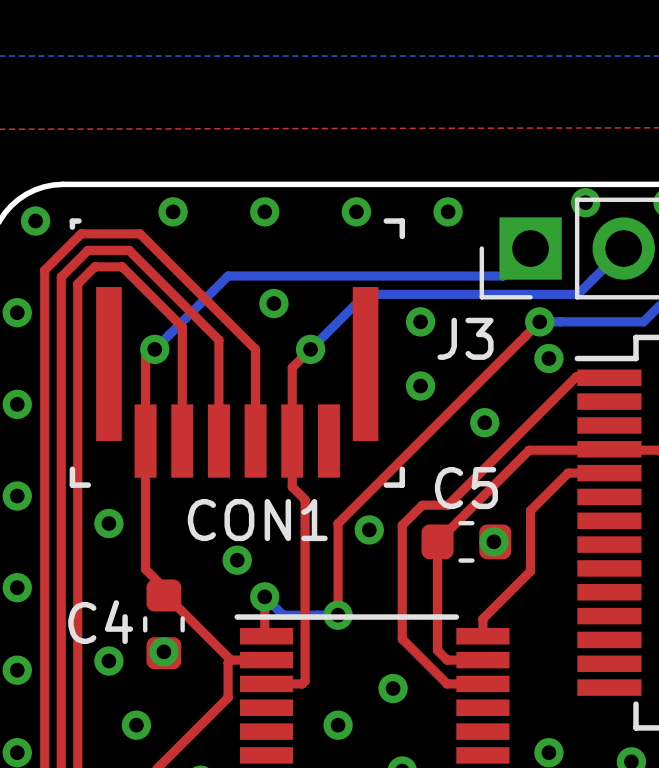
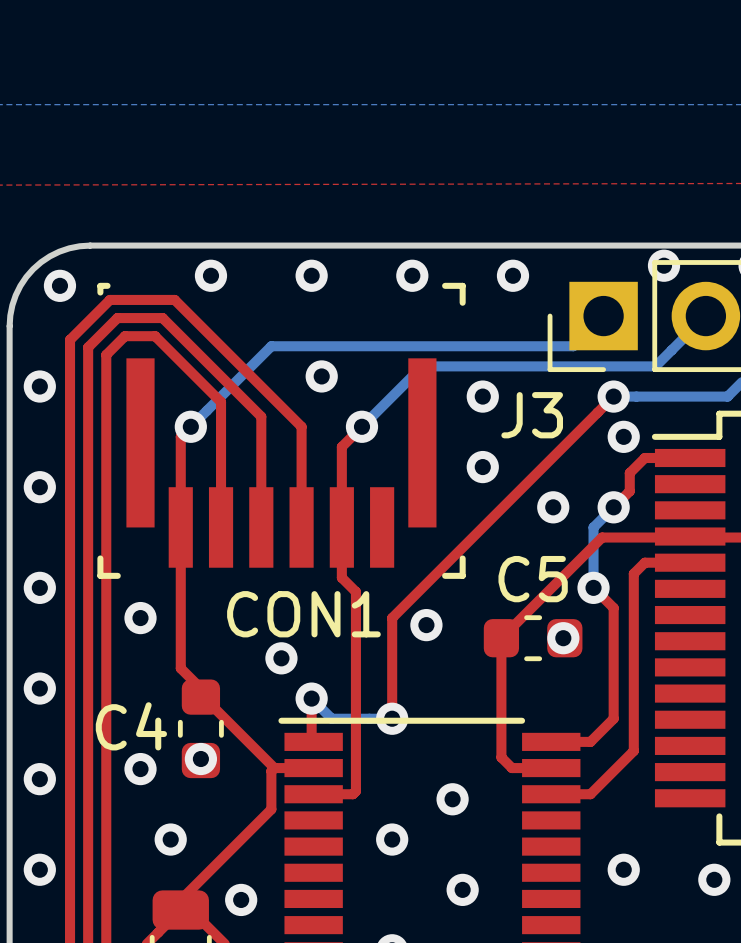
top track: (603, 376) (576, 376) (448, 505) (422, 505) (402, 525) (402, 639) (447, 683) (482, 683) -> (633, 573) (633, 750) (590, 794) (551, 794)
top track: none -> (690, 457) (644, 457) (629, 473) (629, 491) (613, 507)
bottom track: none -> (613, 507) (593, 527) (593, 587)
via: none -> (613, 507)
top track: (558, 483) (530, 510) (530, 571) (482, 618) (482, 636) -> (593, 587) (613, 608) (613, 718) (590, 741) (551, 741)
via: none -> (593, 587)

